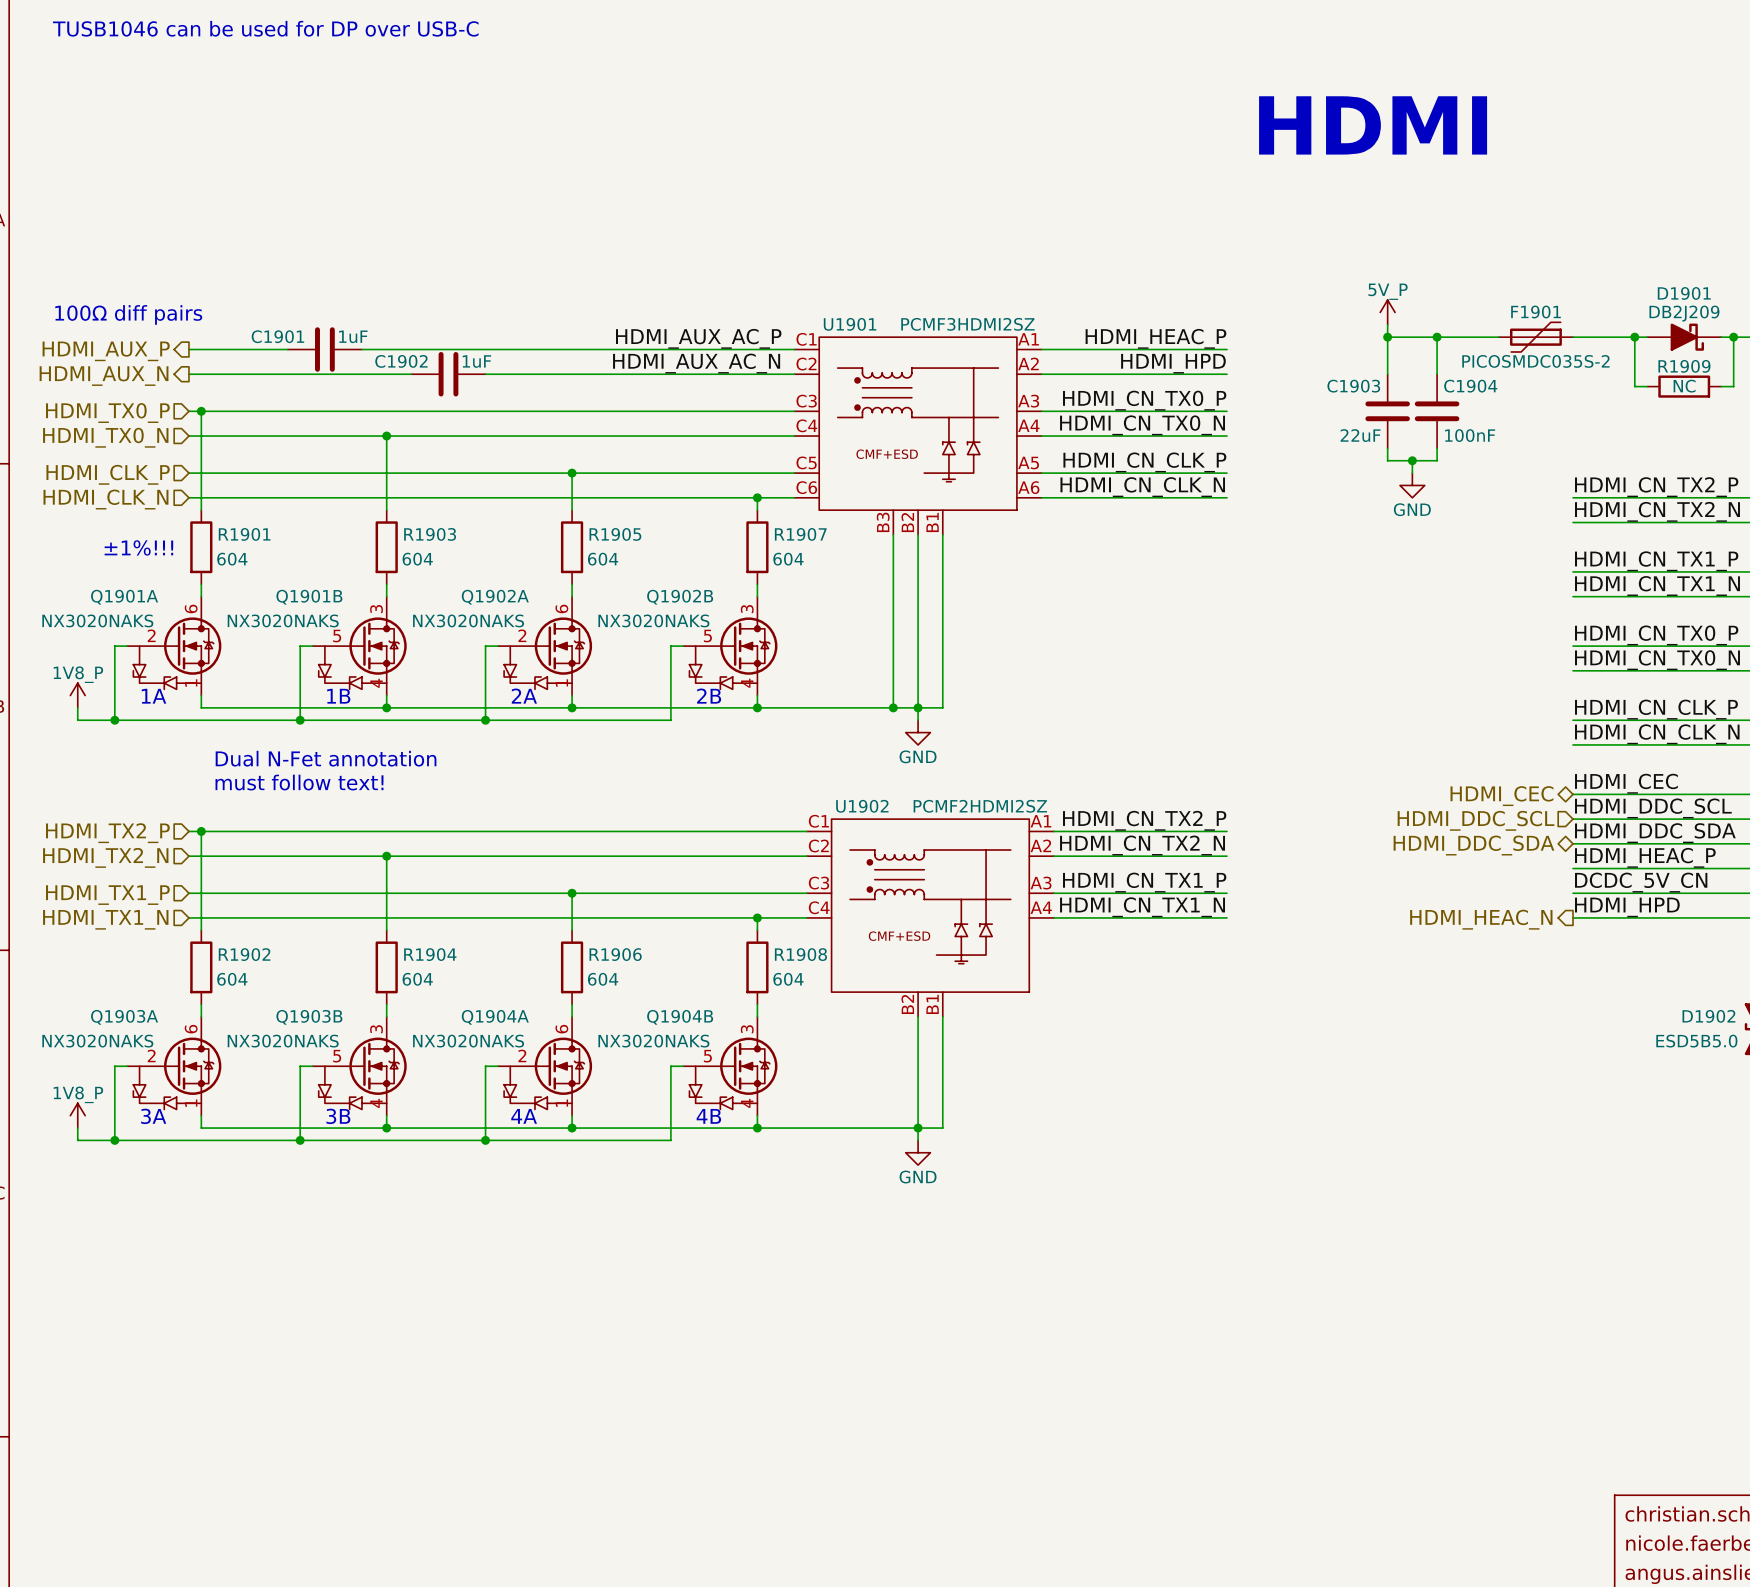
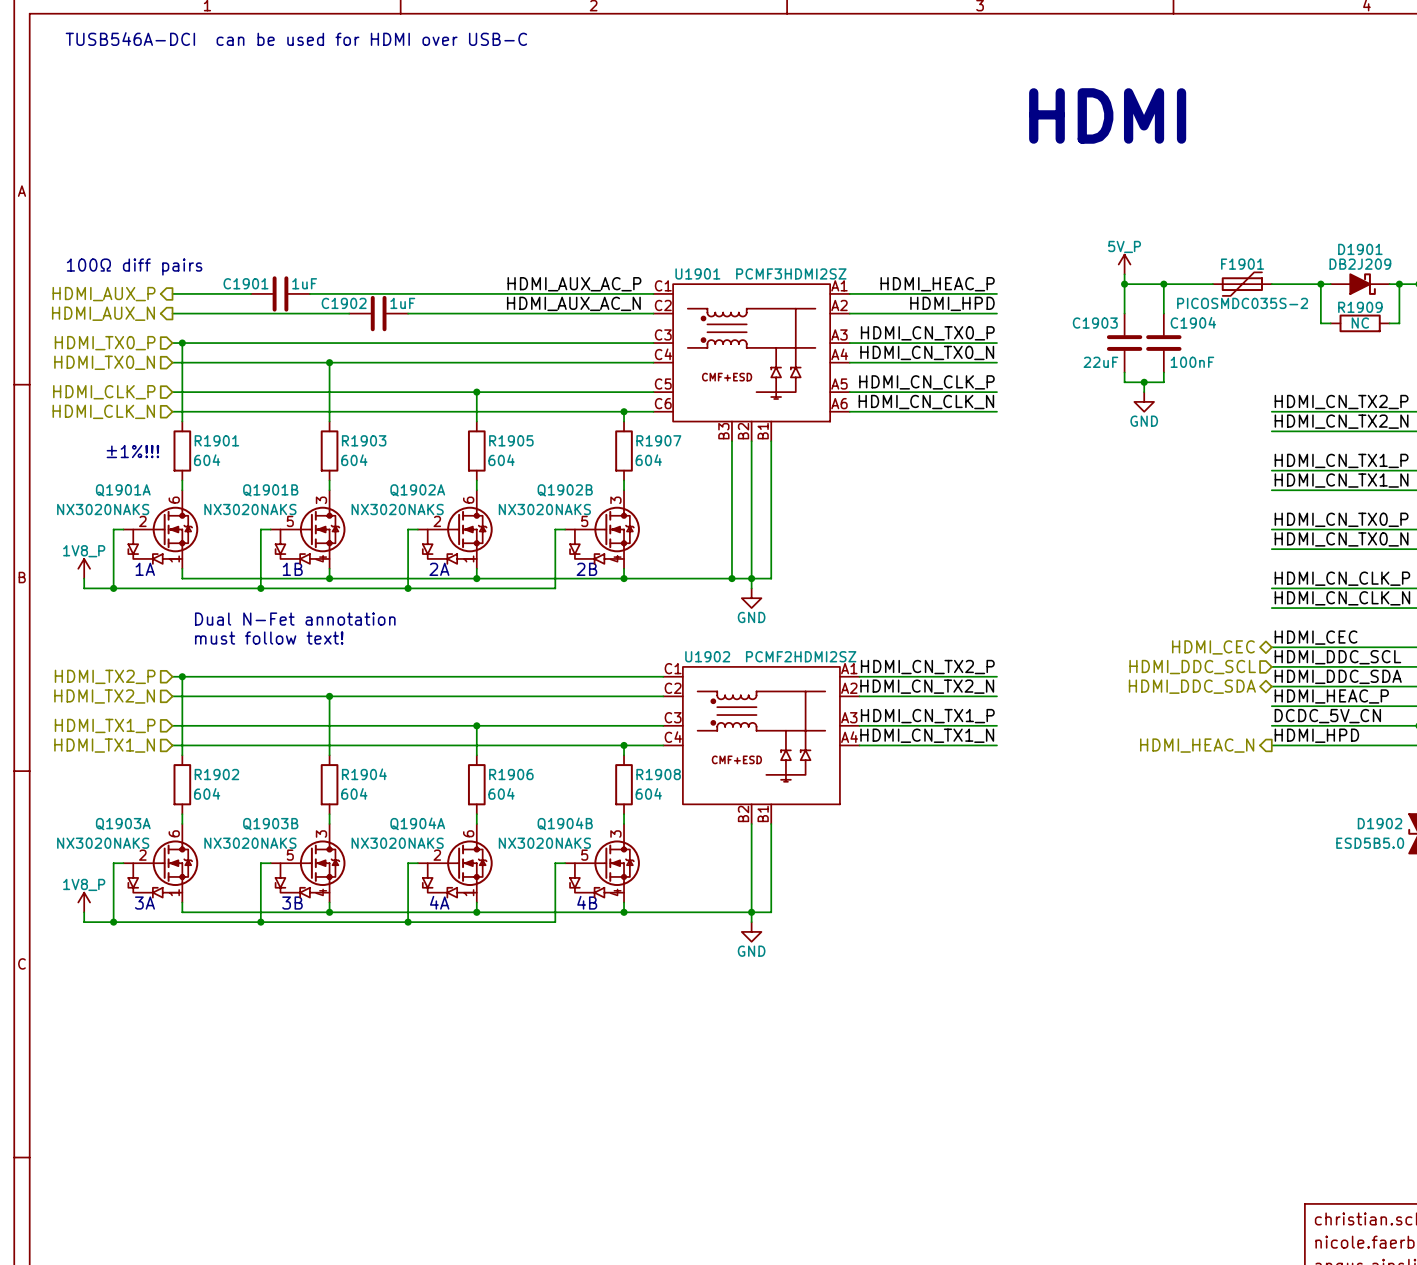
text: TUSB1046 can be used for DP over USB-C (265, 28) -> TUSB546A-DCI can be used for HDMI over USB-C (296, 39)

